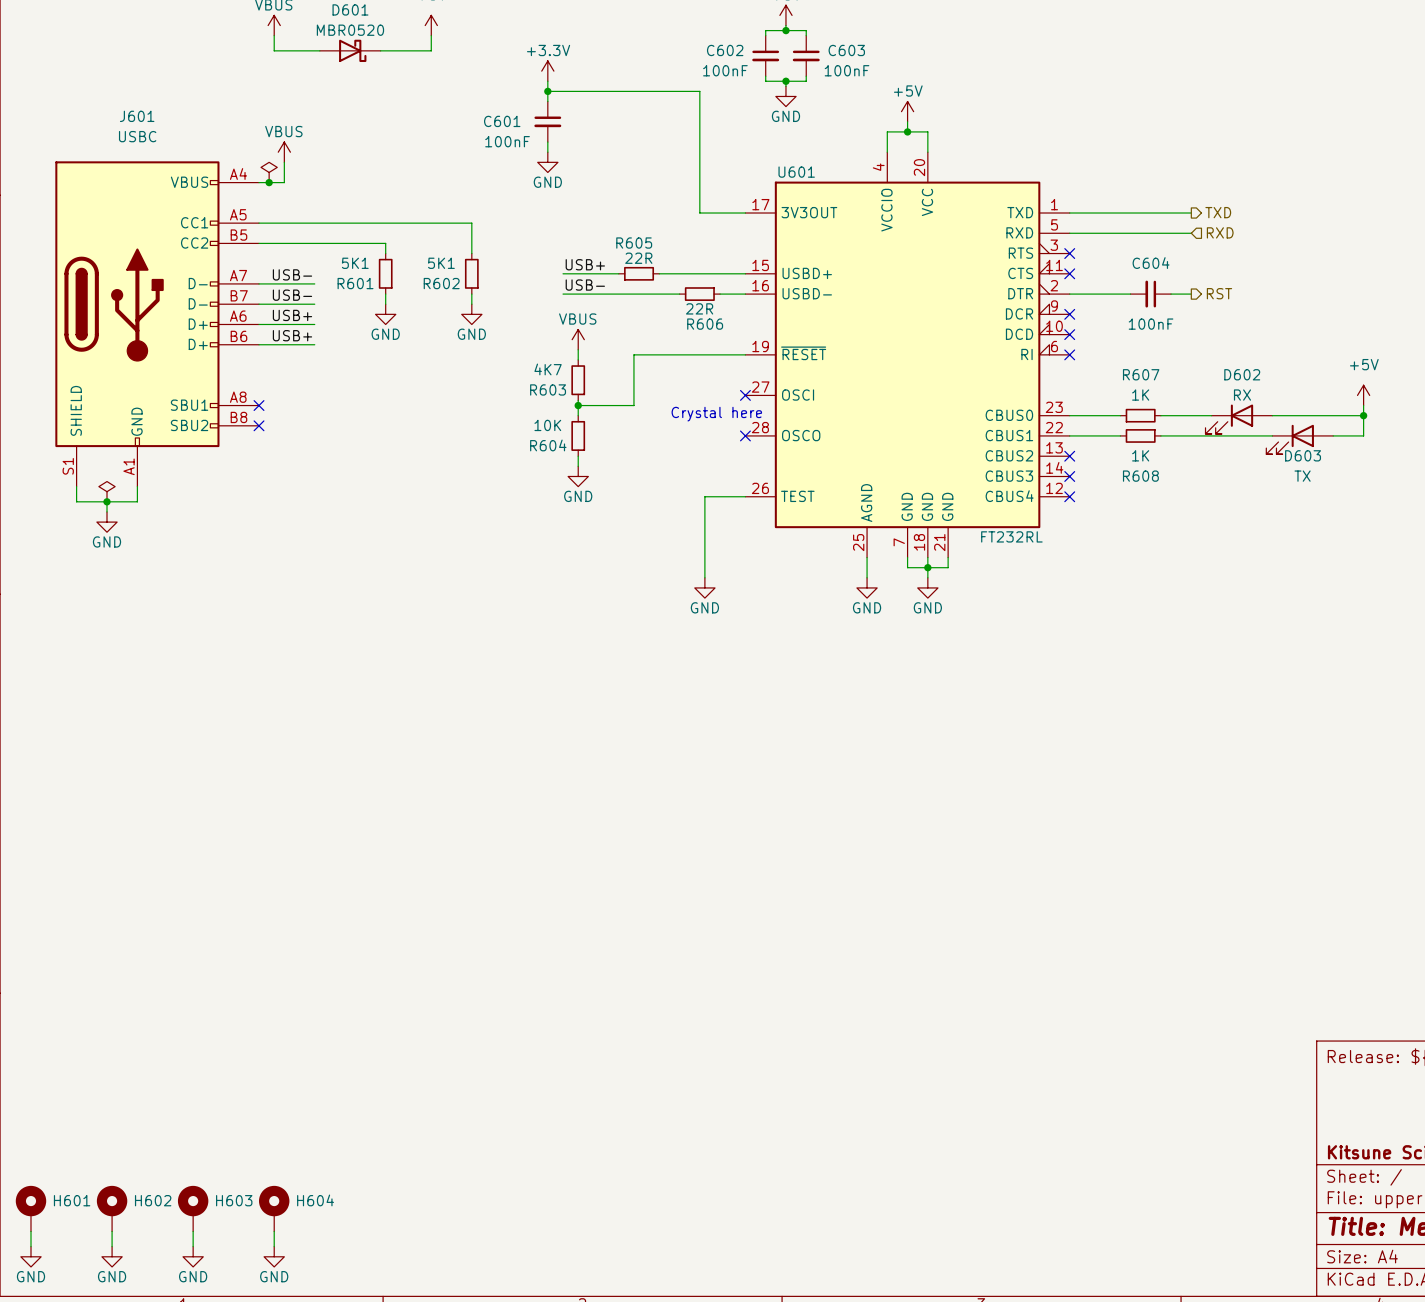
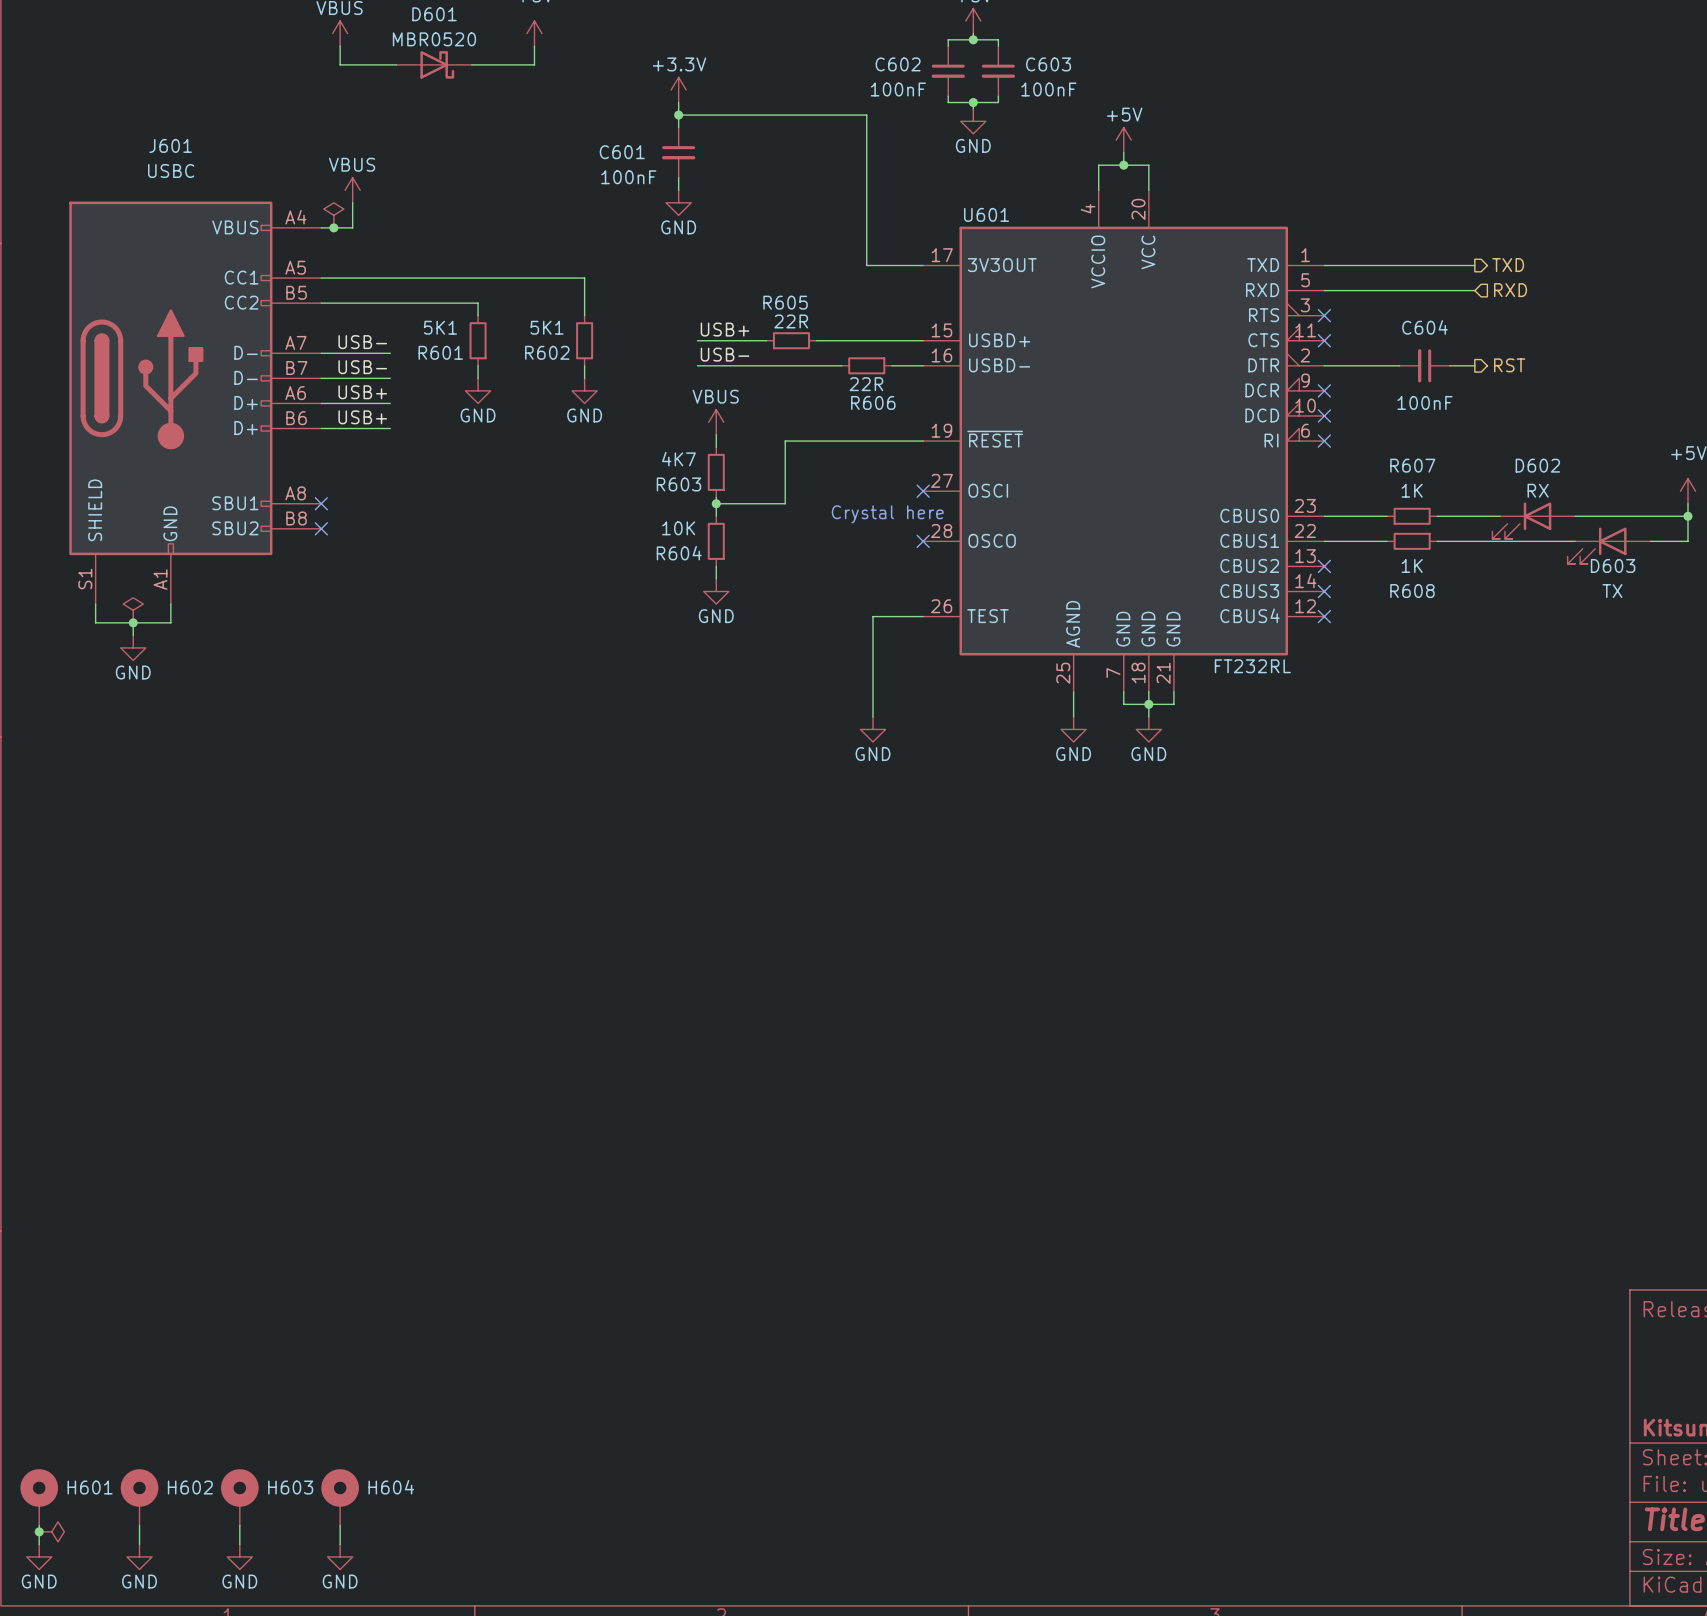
junction: none -> (39, 1531)
power symbol: none -> (51, 1531)

